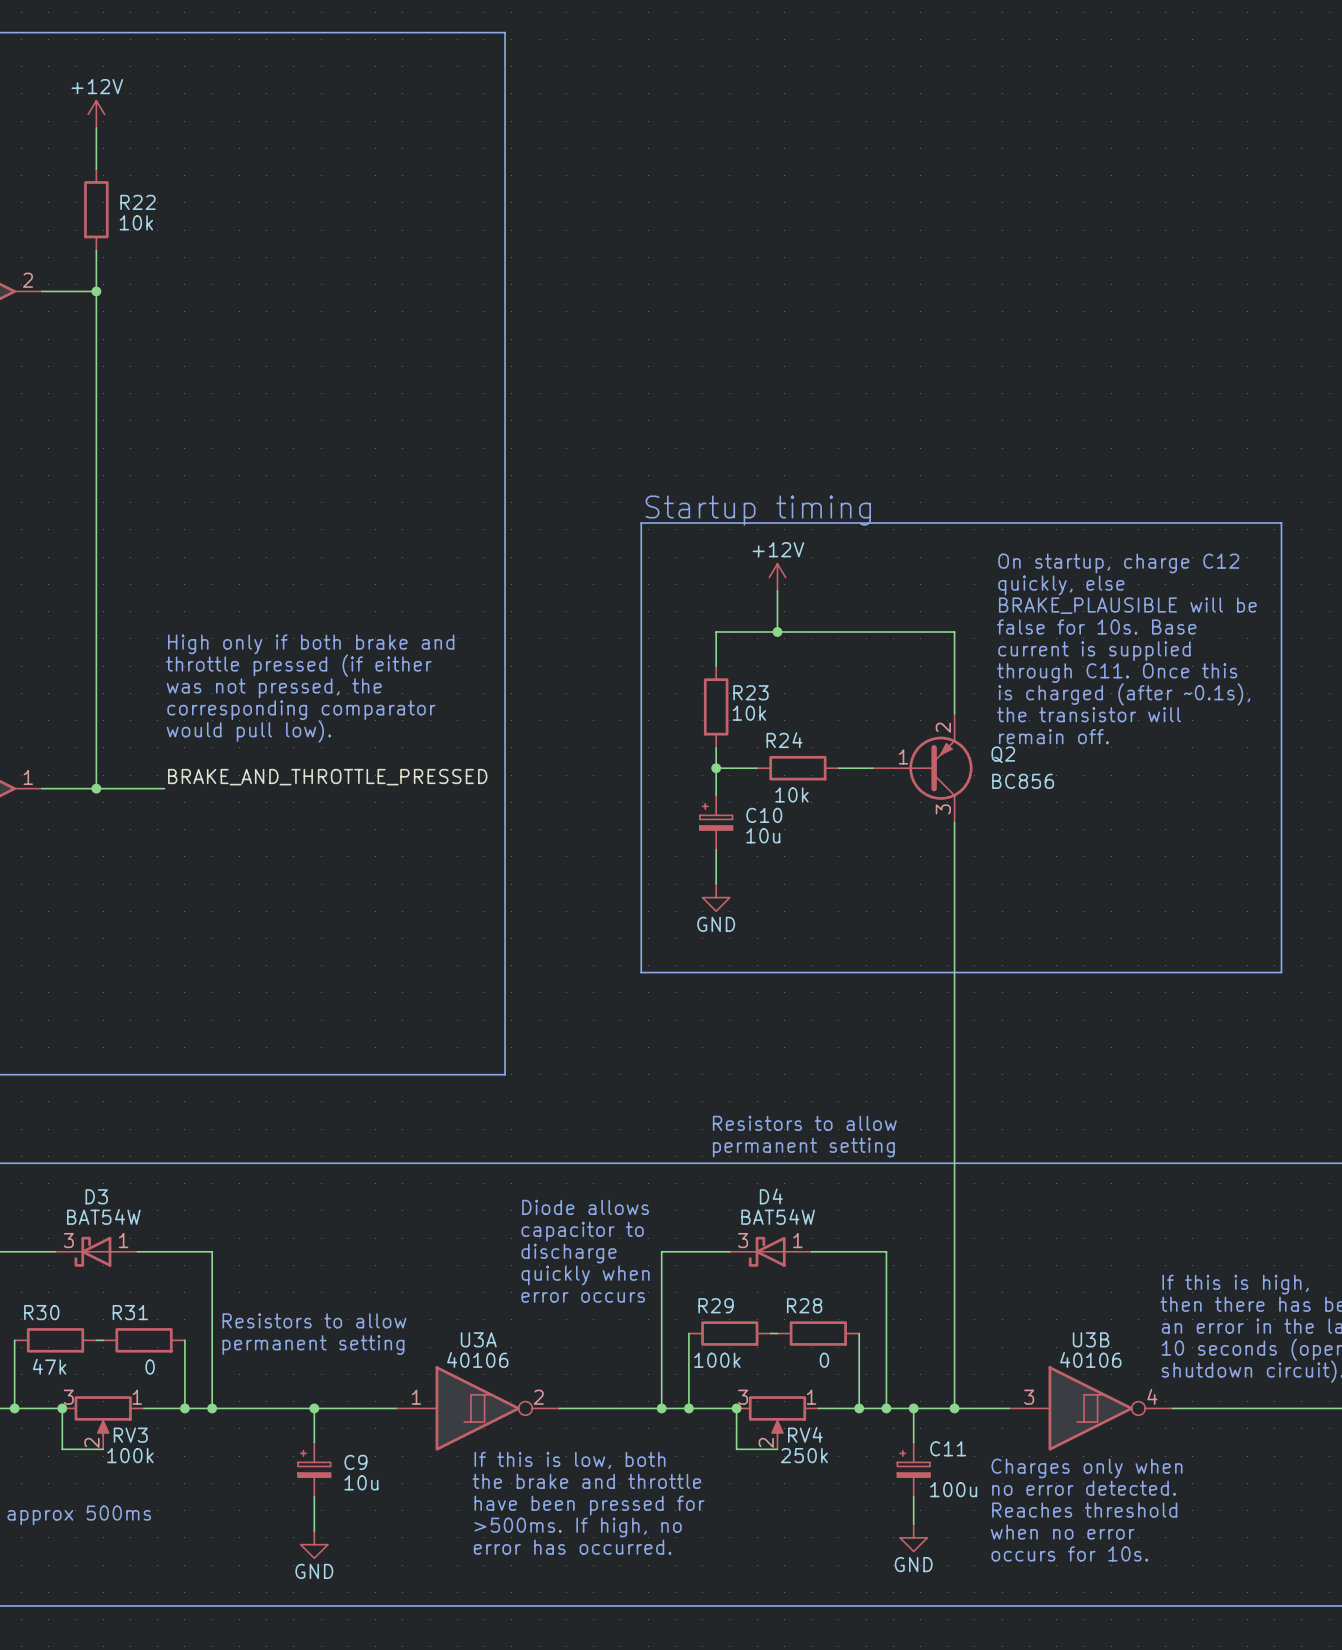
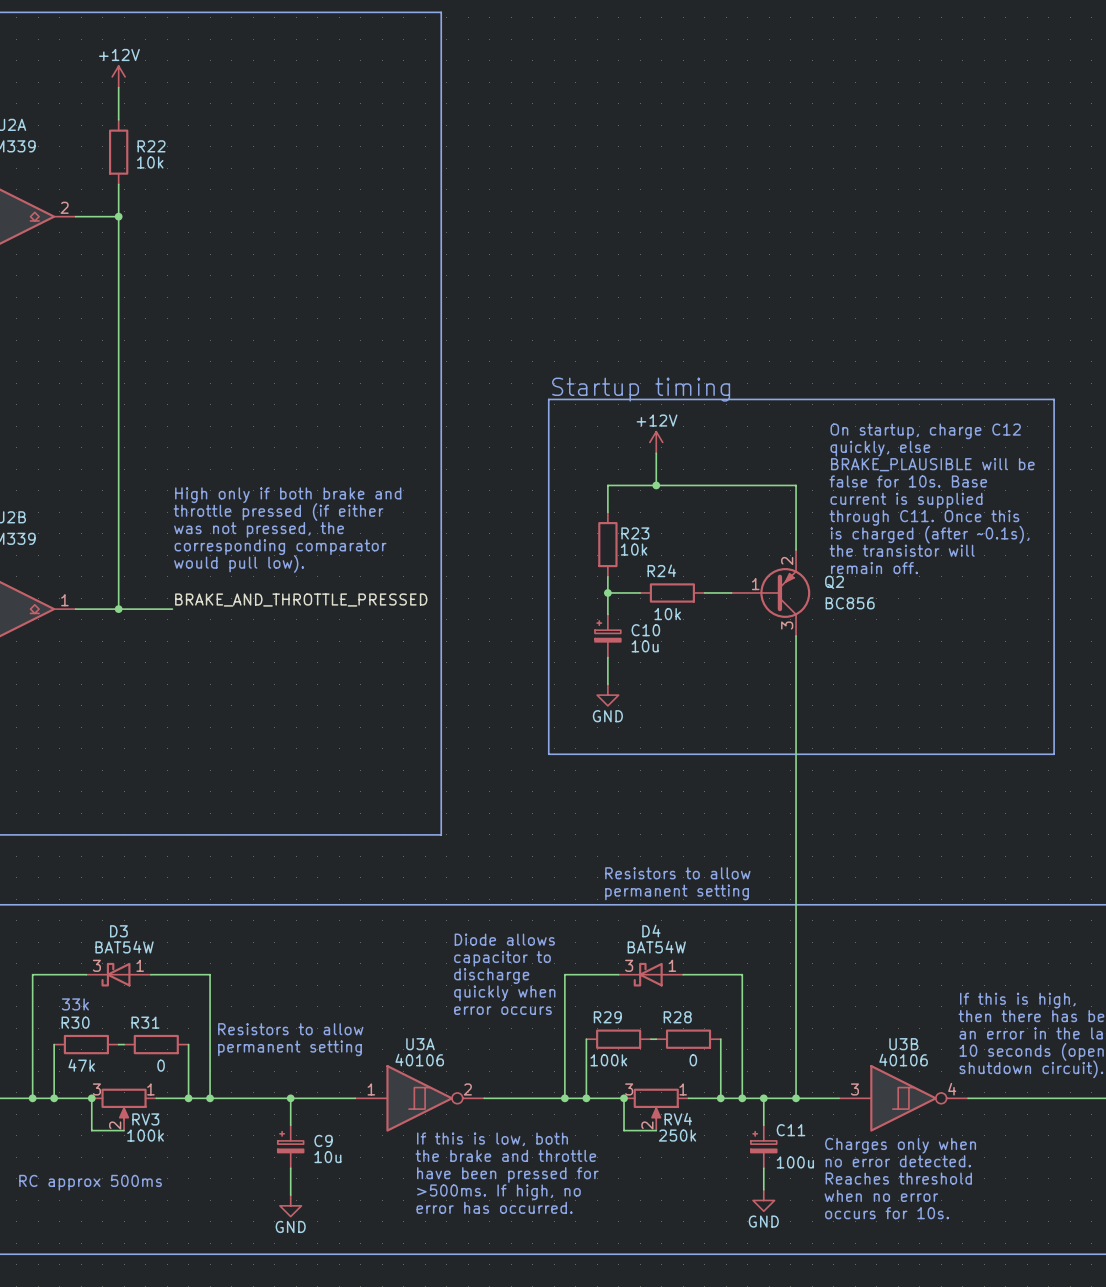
text: none -> 33k (75, 1004)

